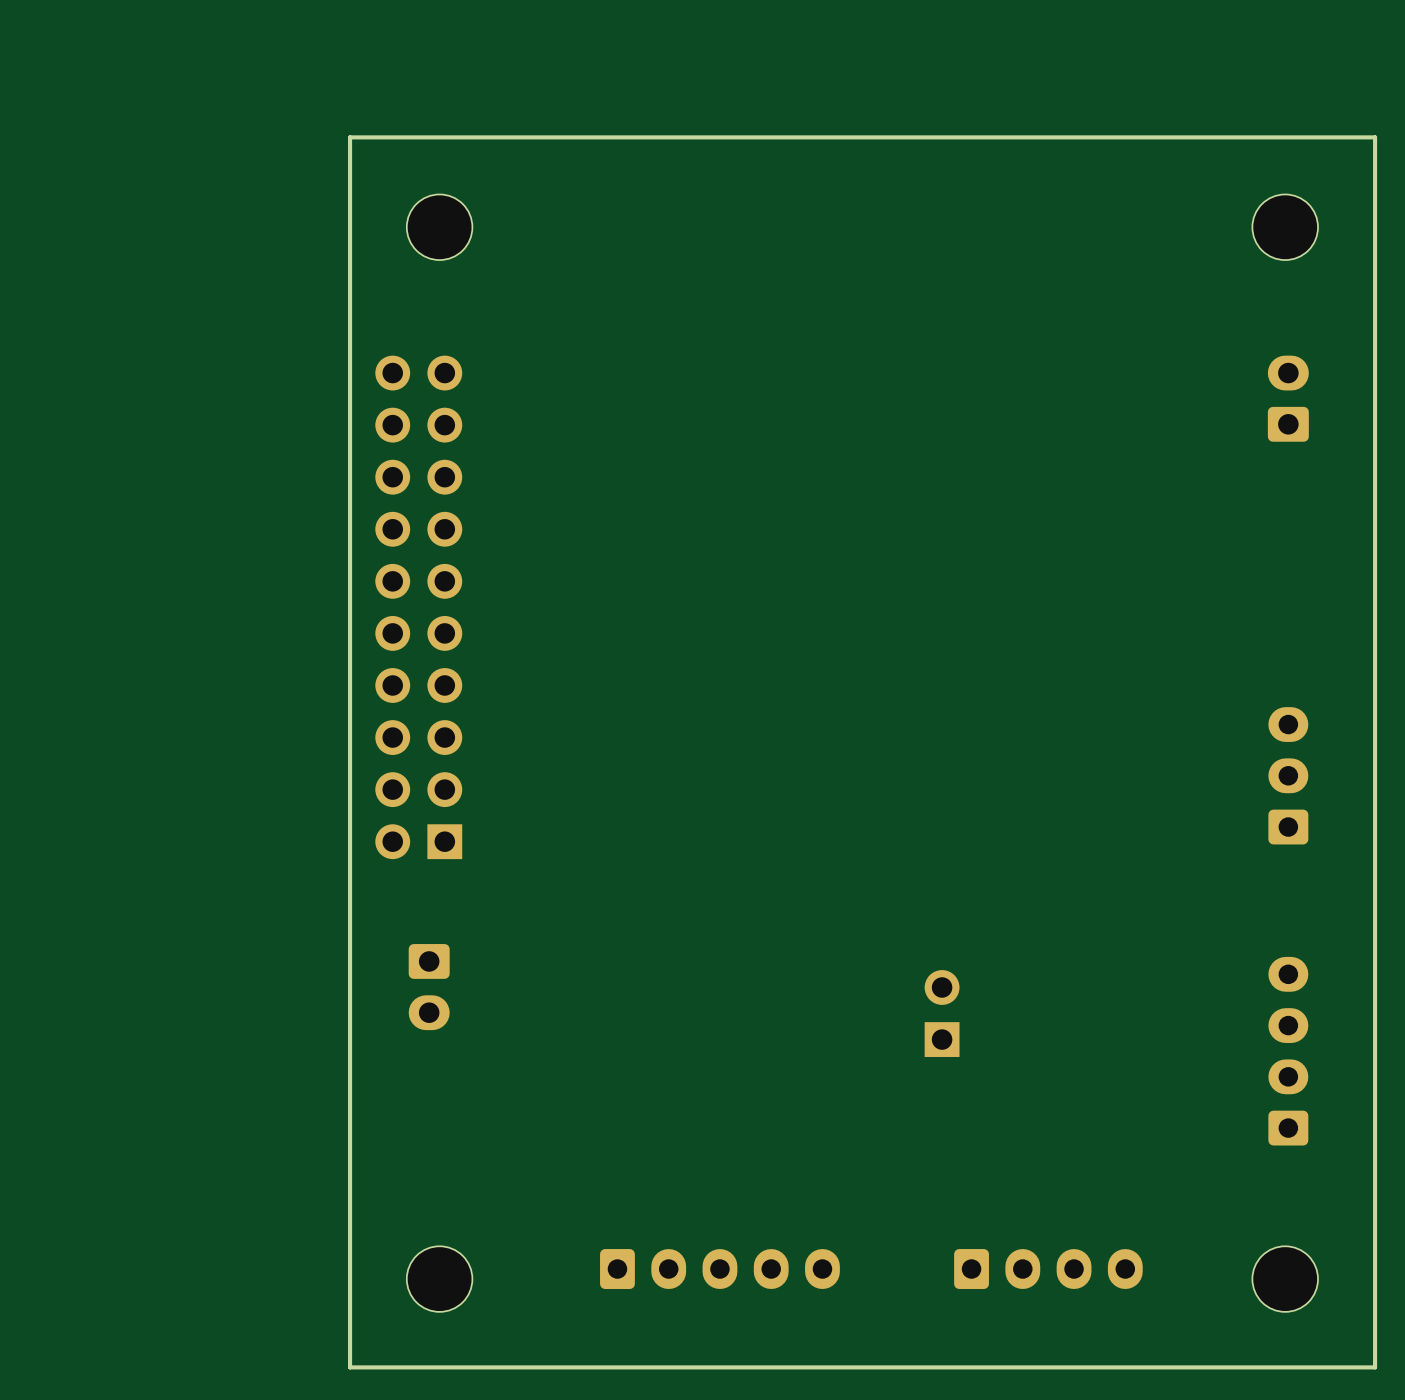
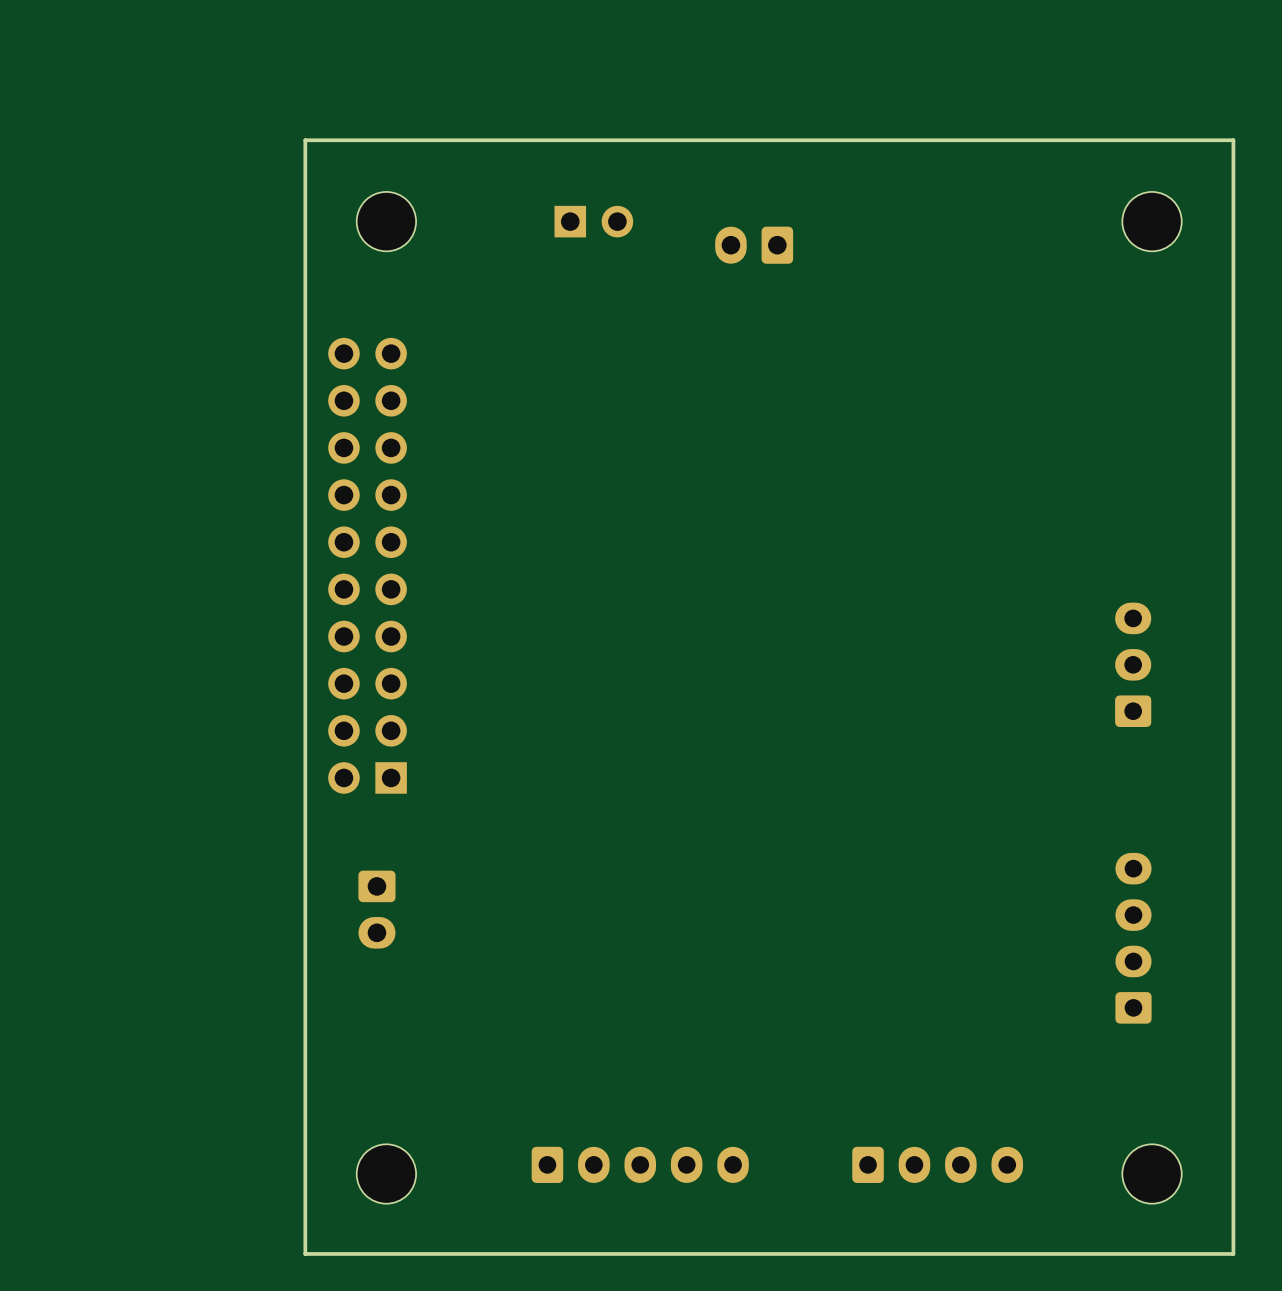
part: none -> (593, 221)
part rotation: 0° (1288, 398) -> 90° counterclockwise (754, 245)
part position: (1288, 398) -> (754, 245)
part position: (1288, 775) -> (1133, 664)
part: (942, 1013) -> none
part position: (1288, 1051) -> (1133, 938)

